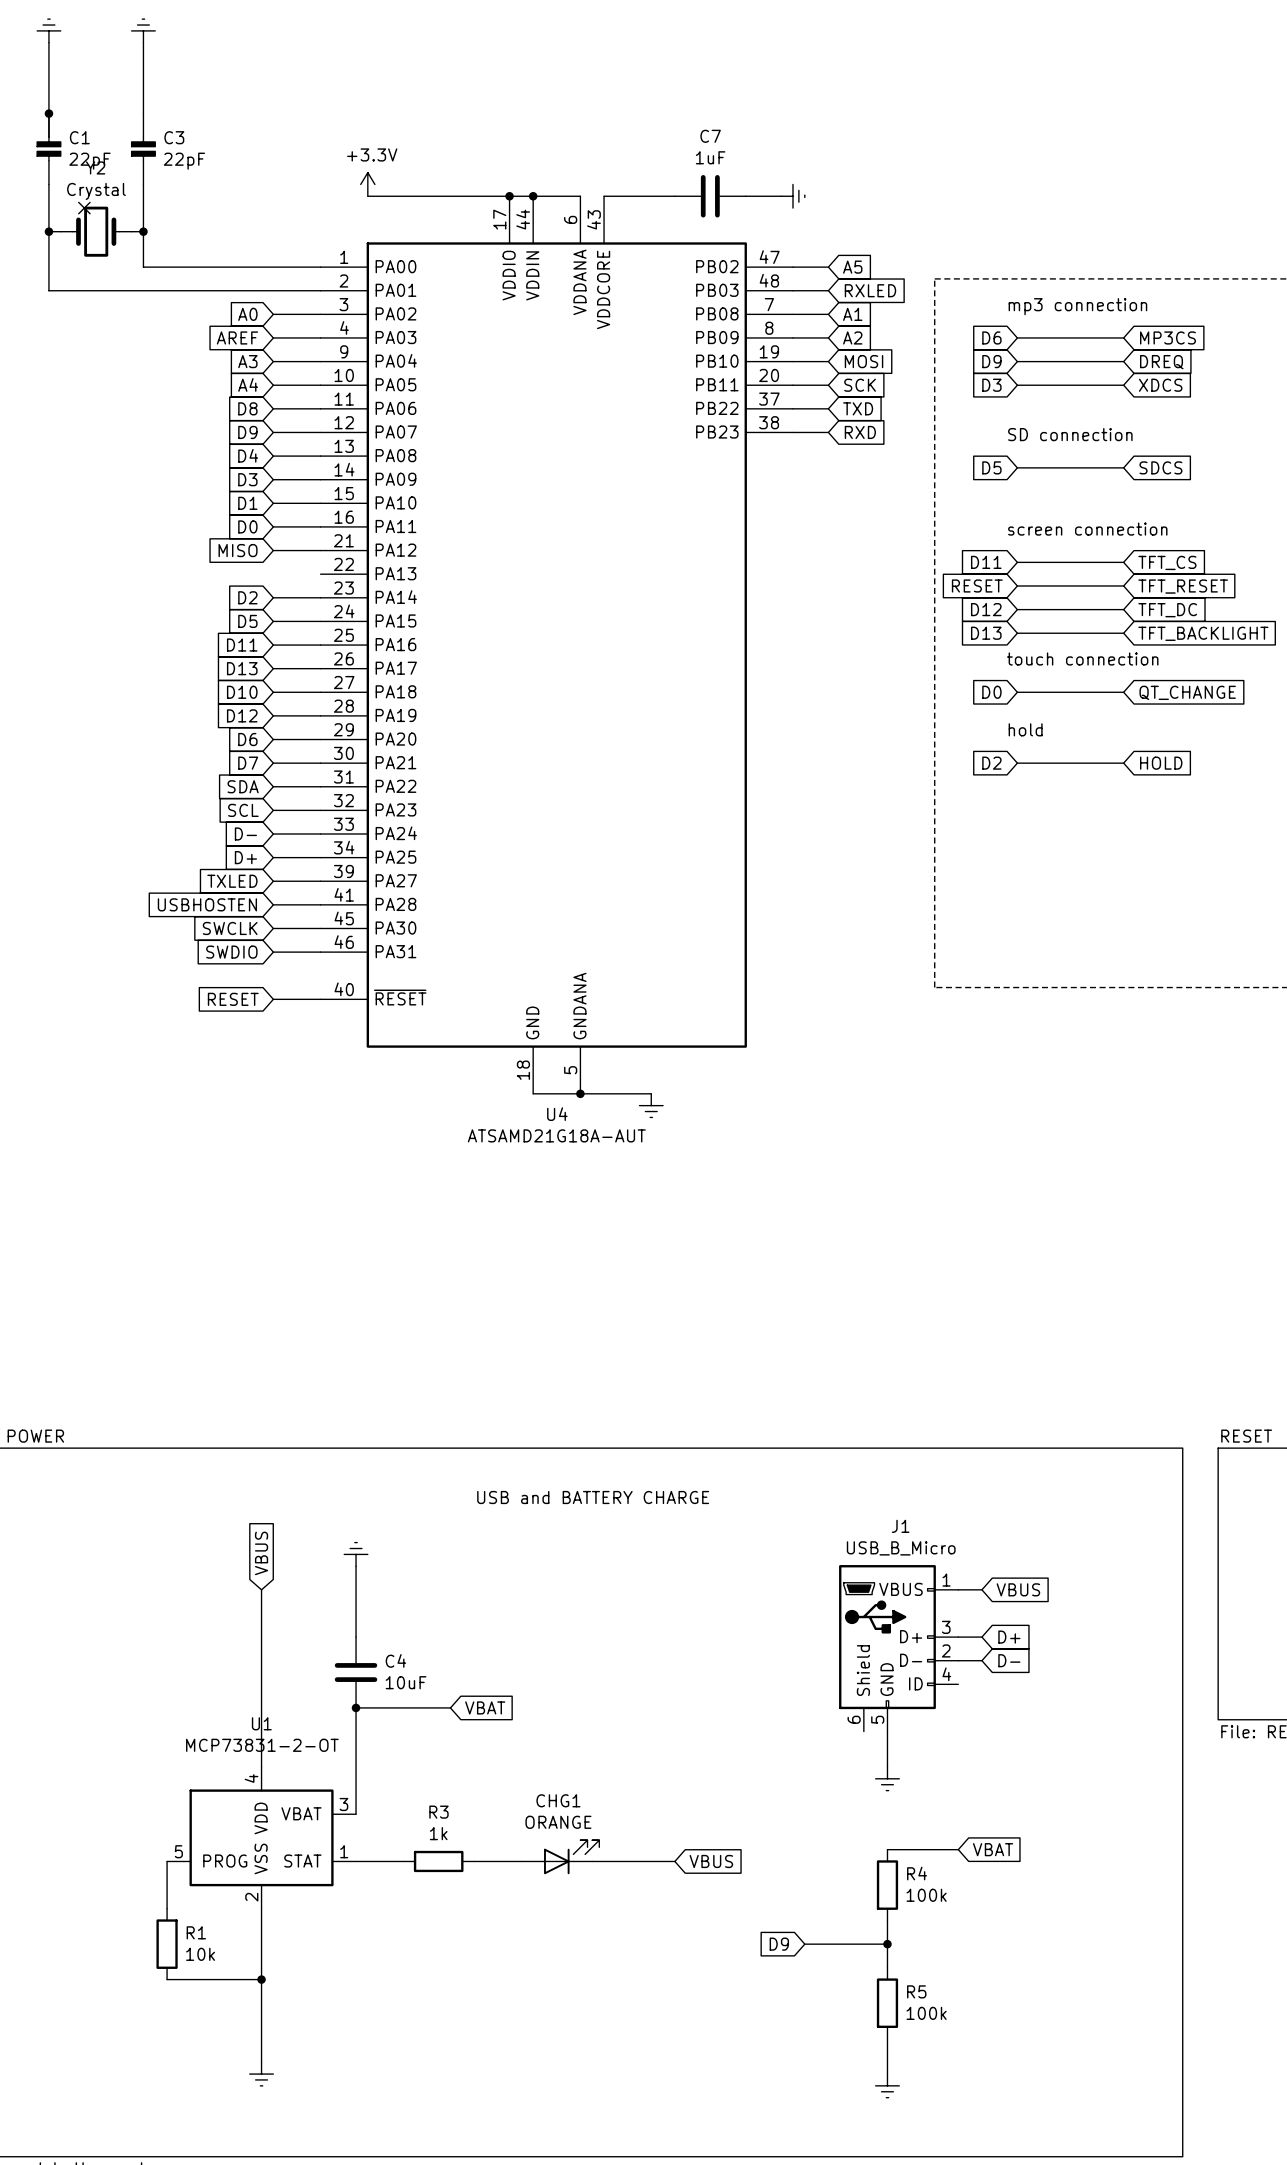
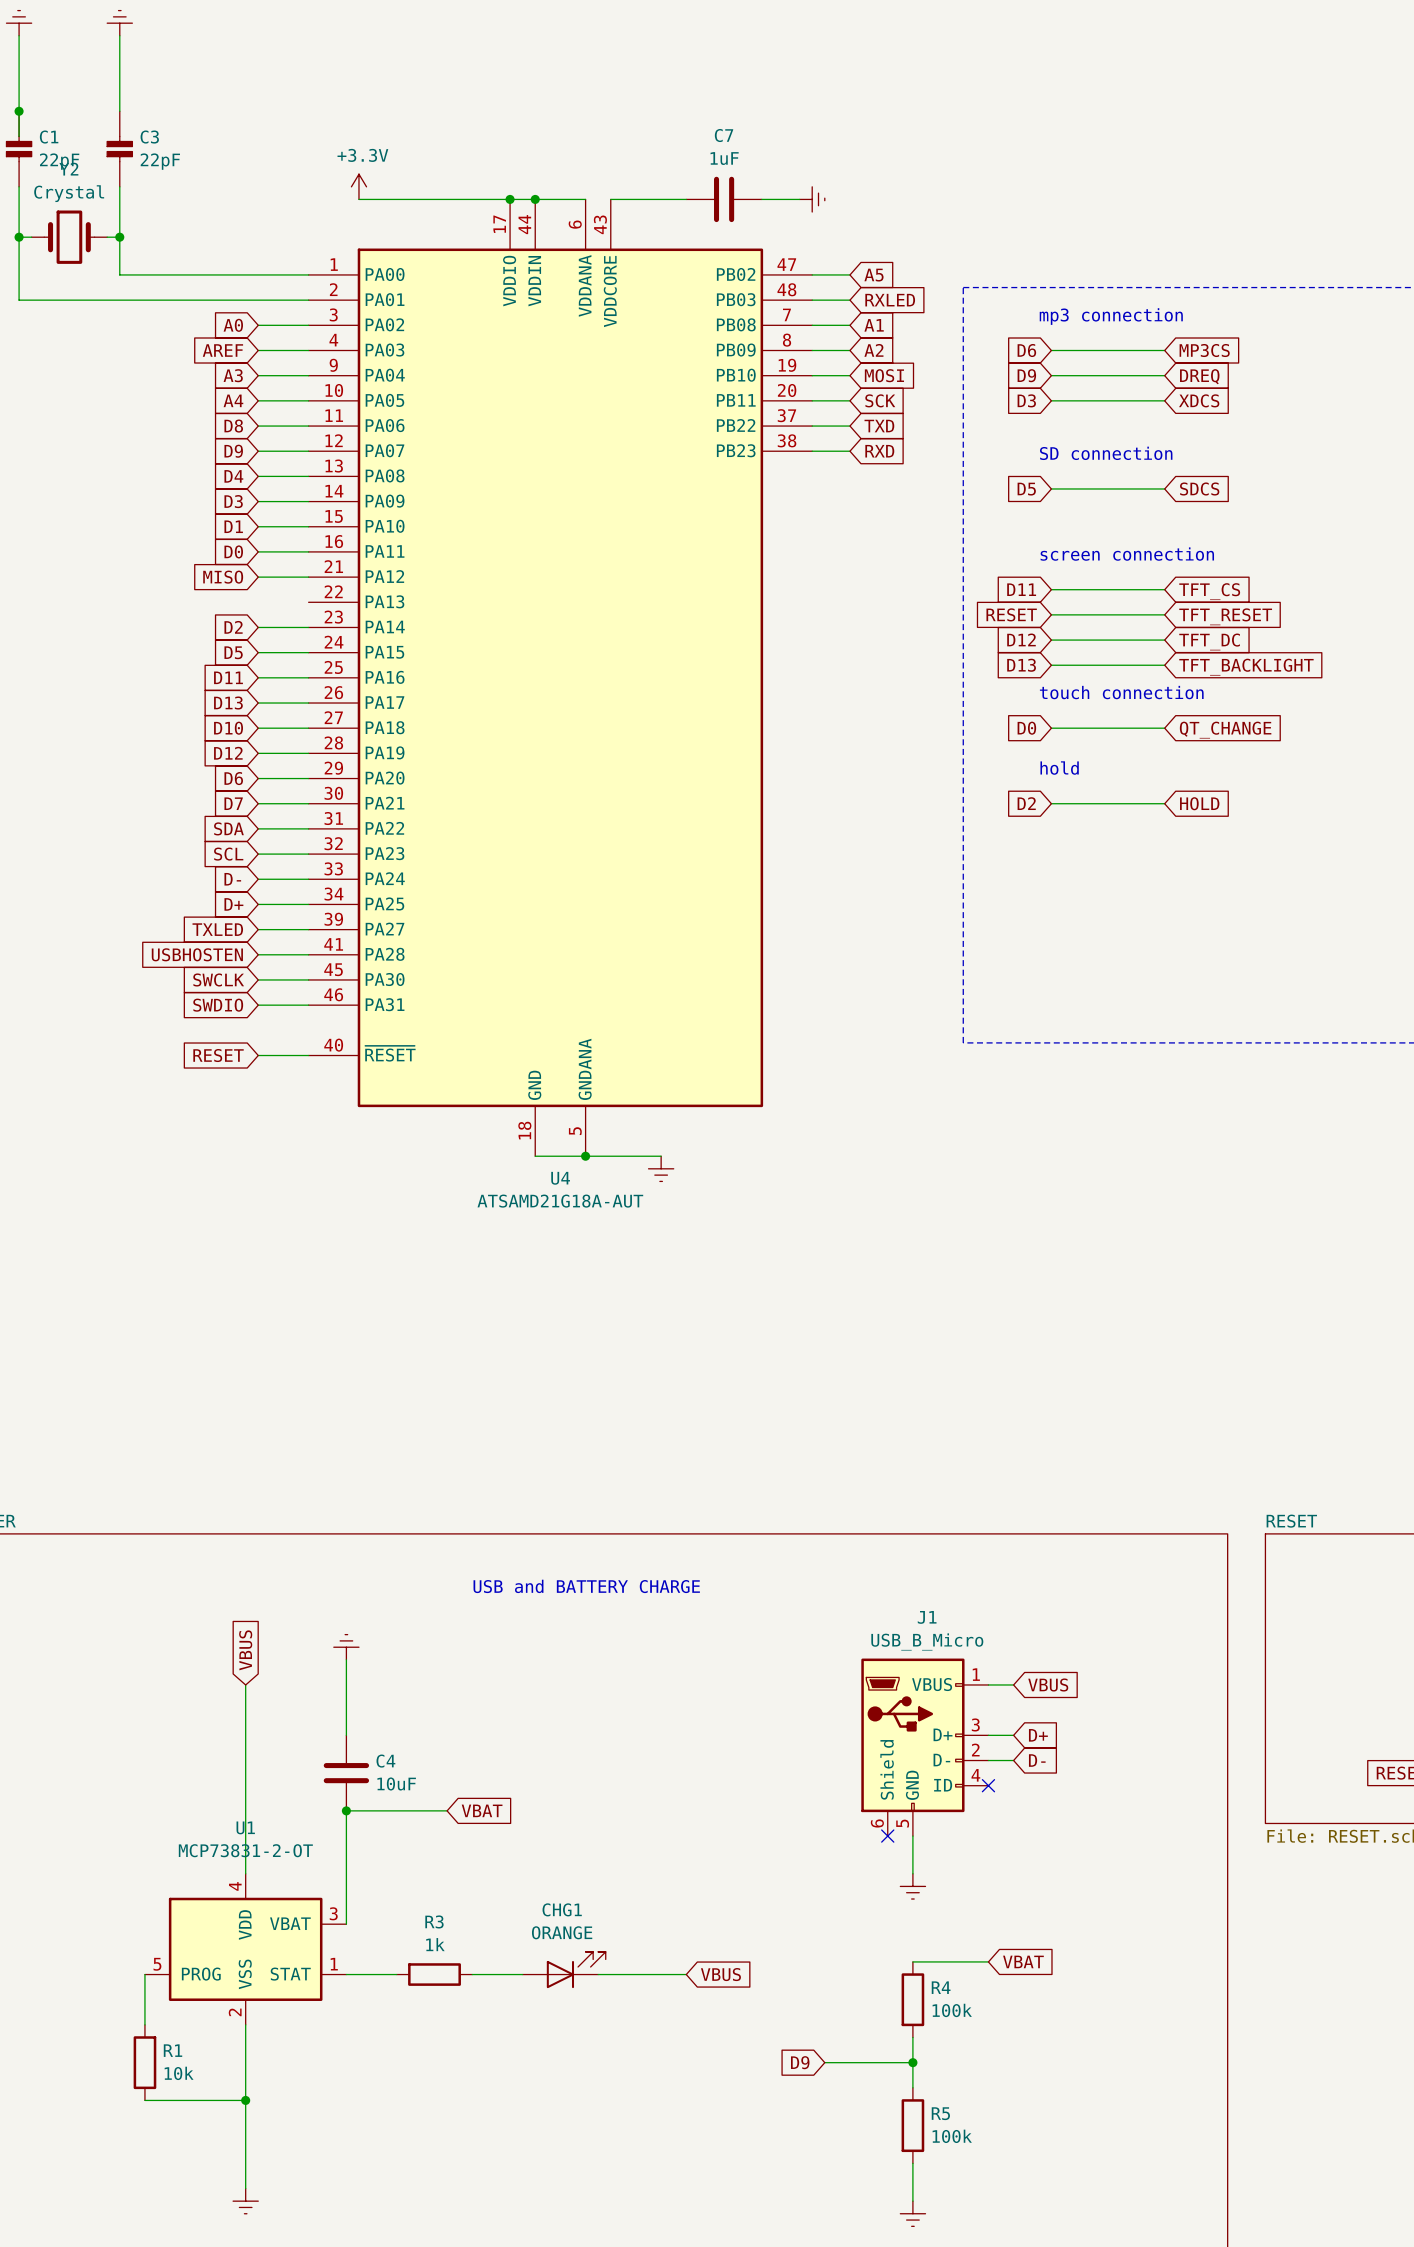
no-connect mark: (84, 208) -> none
no-connect mark: none -> (988, 1785)
no-connect mark: none -> (887, 1836)

